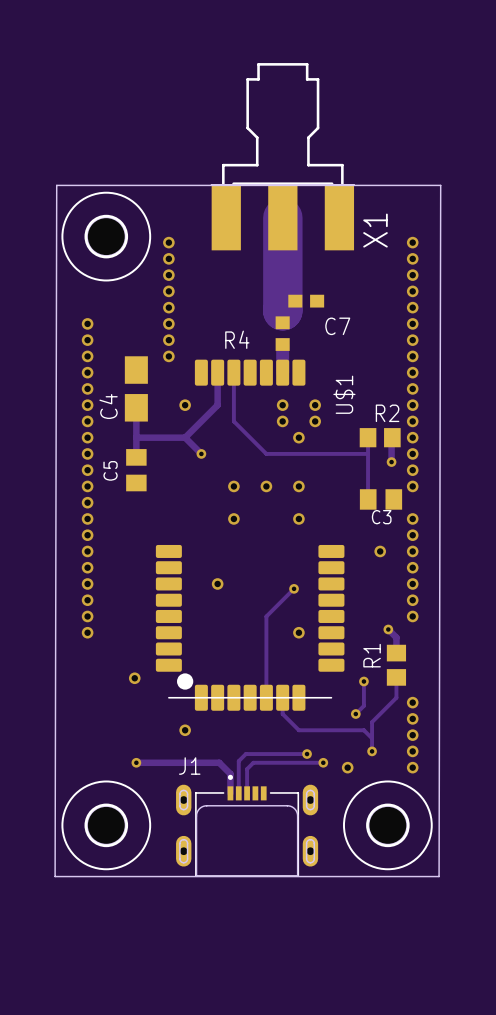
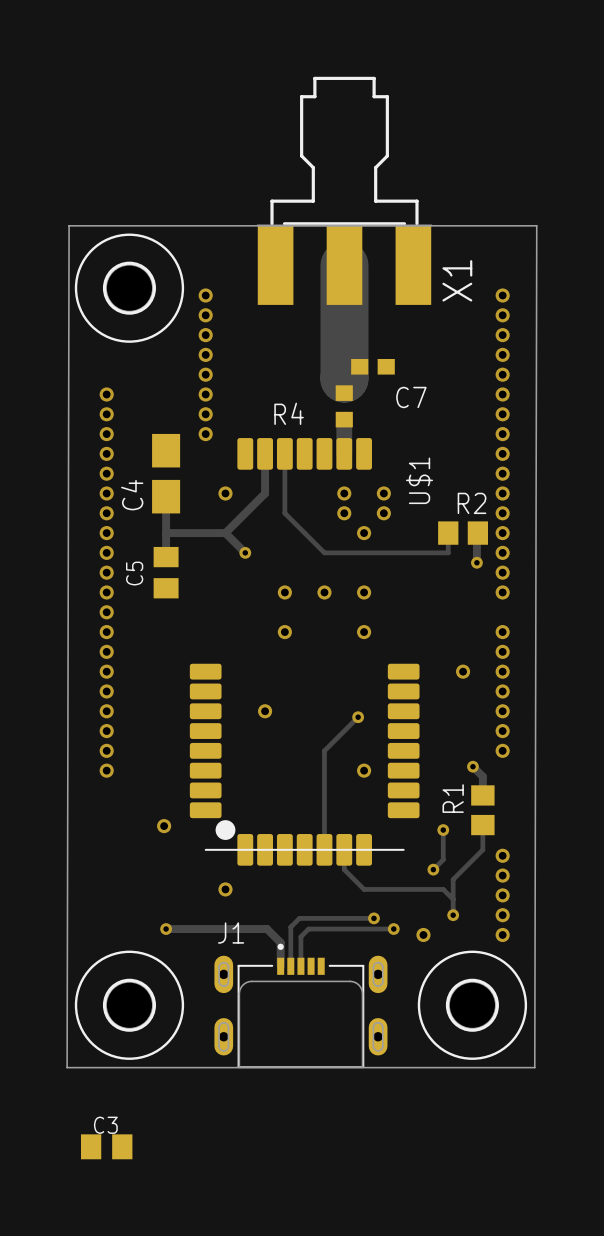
track: (368, 453) (368, 499) -> none
C3 position: (381, 499) -> (106, 1146)
C3 name position: C3 (381, 517) -> C3 (105, 1125)

